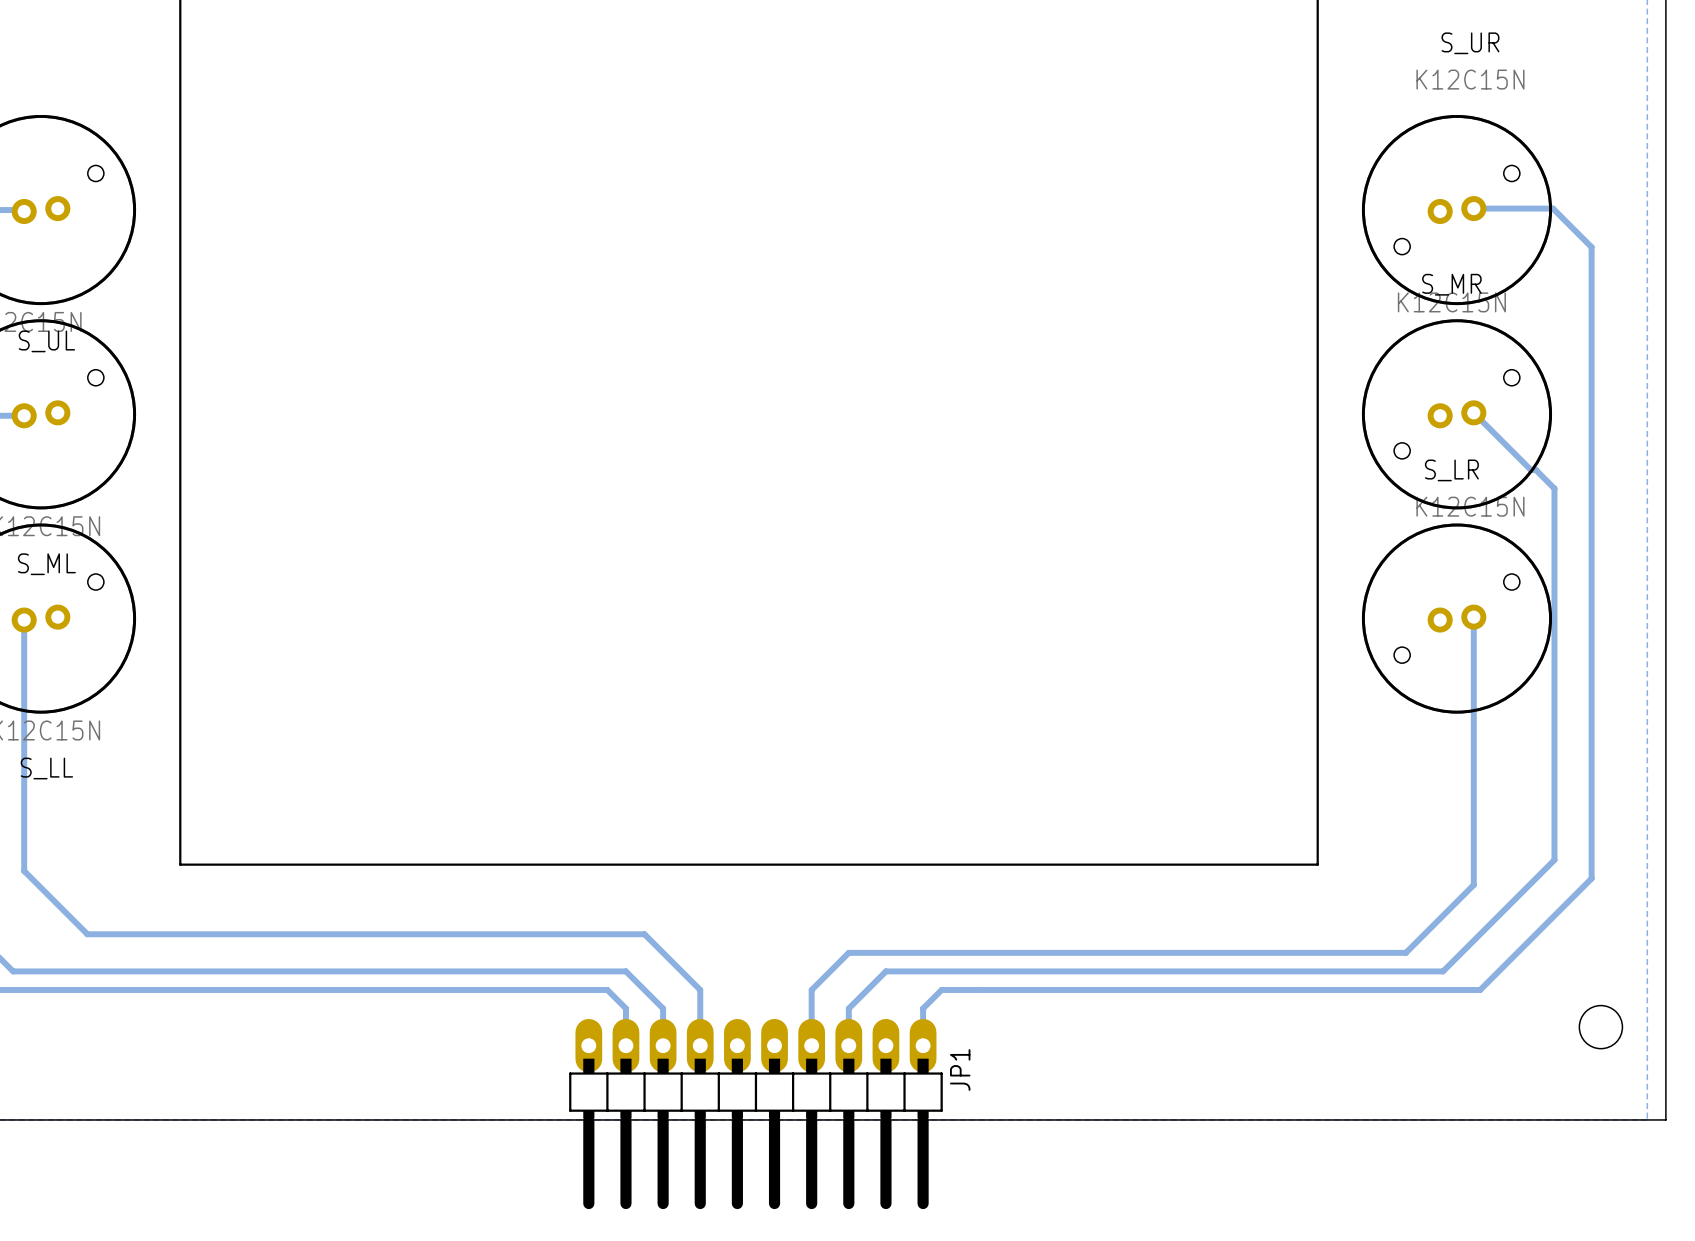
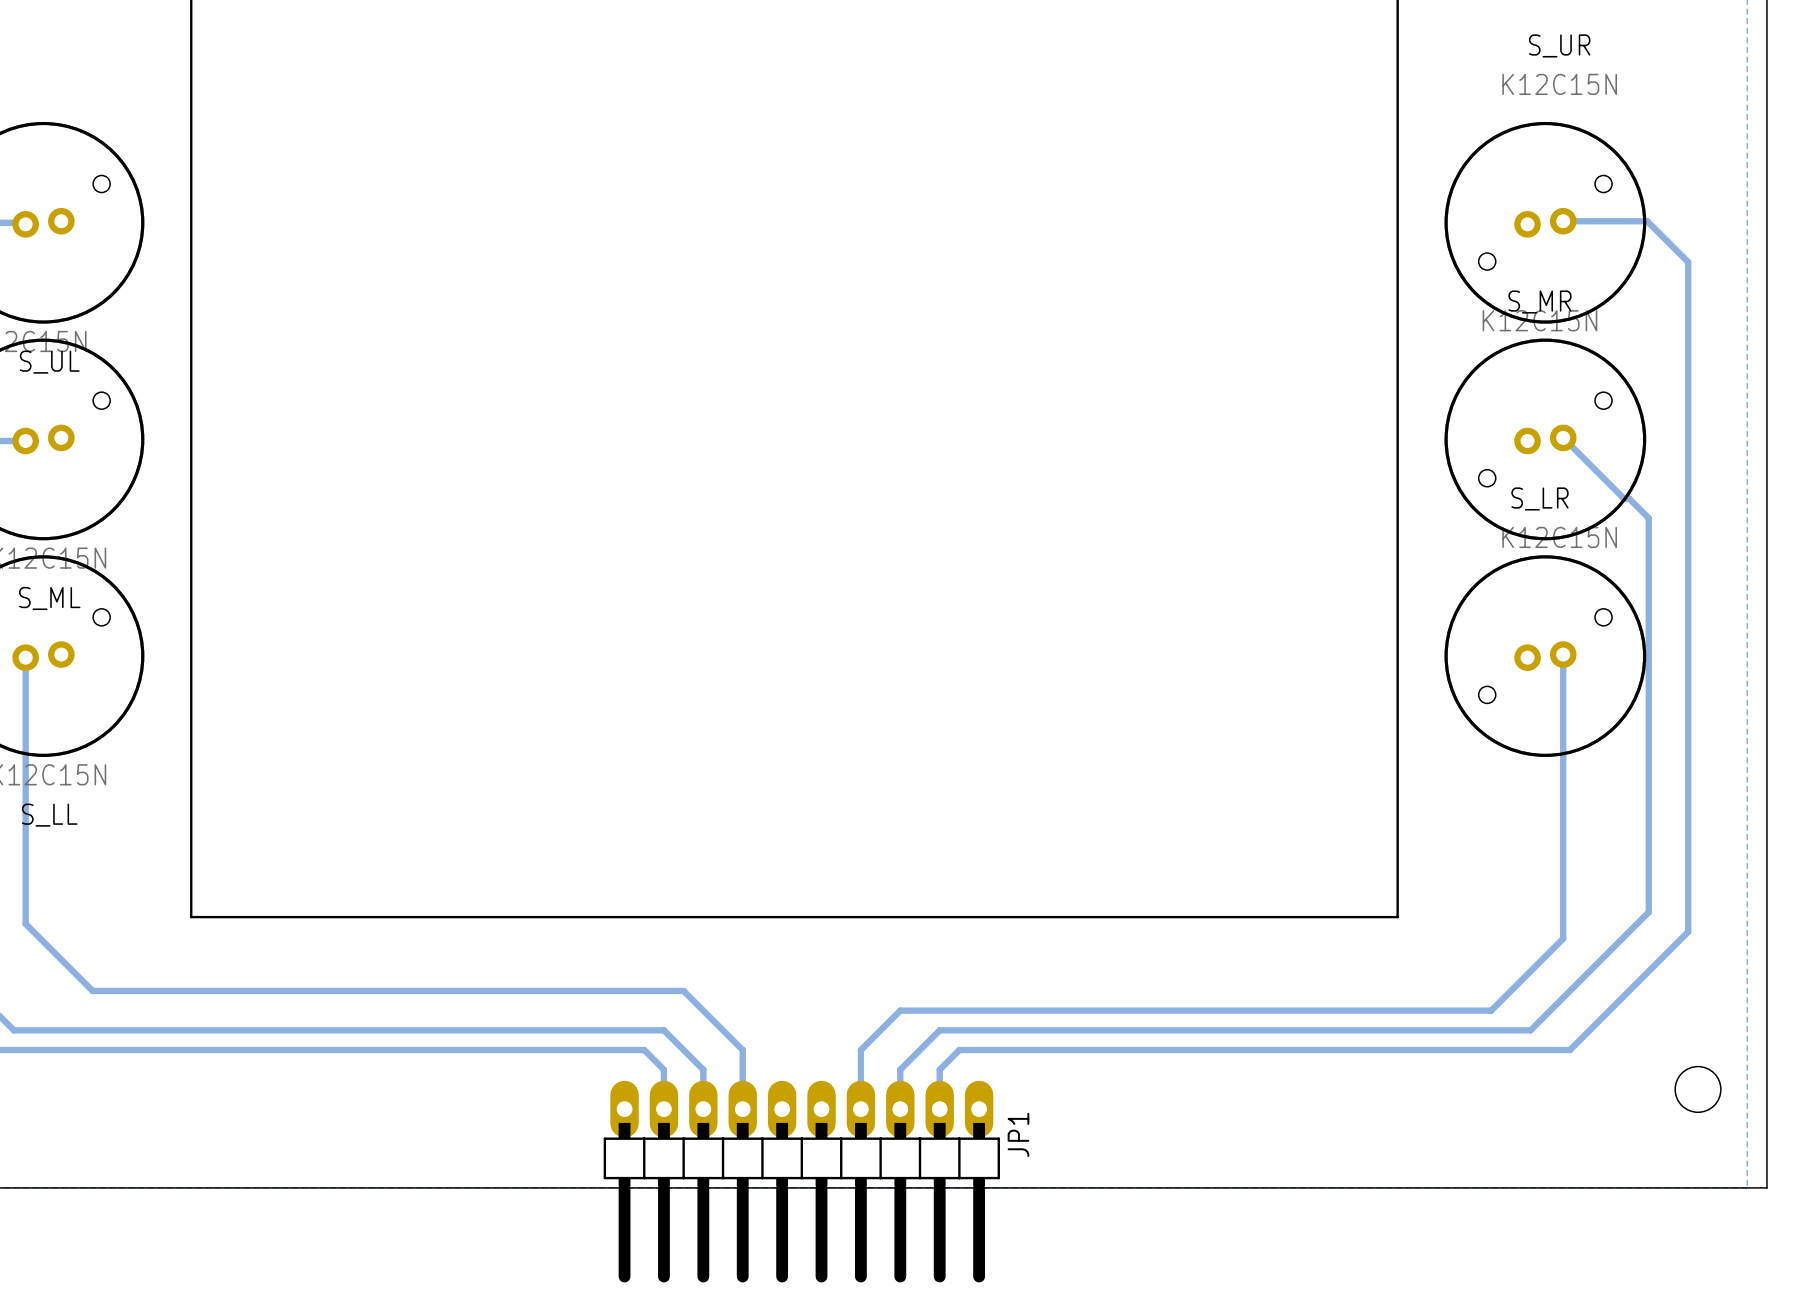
bottom track: (941, 989) (923, 1008) (923, 1045) -> (998, 1050) (959, 1050) (939, 1069) (939, 1109)

